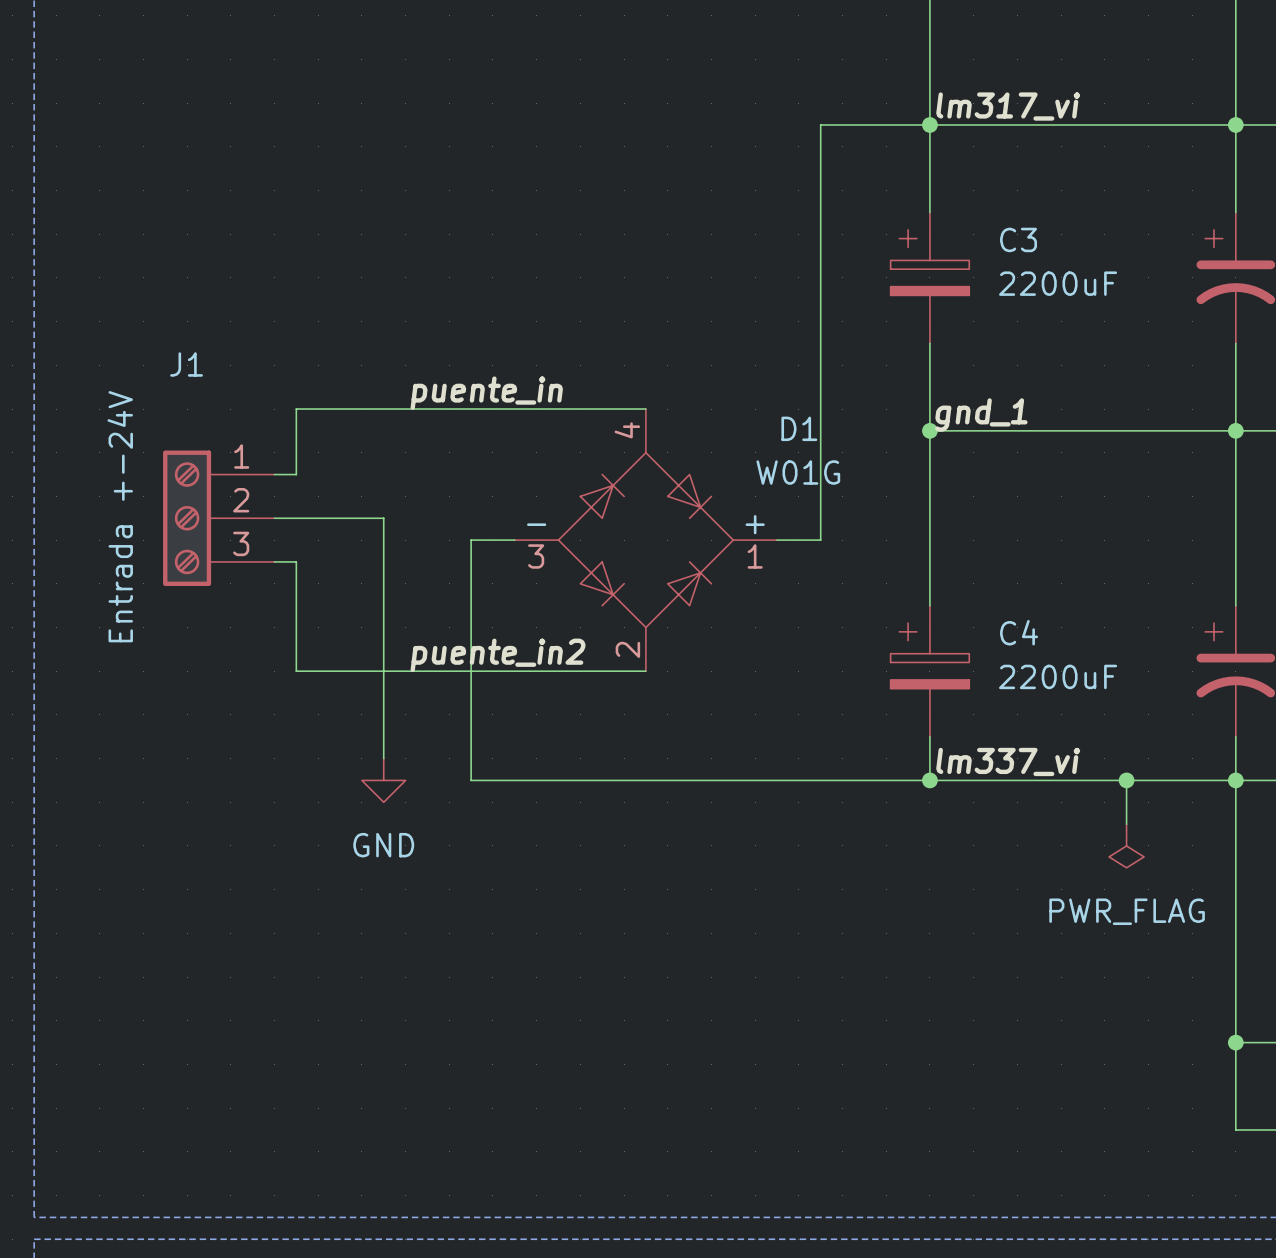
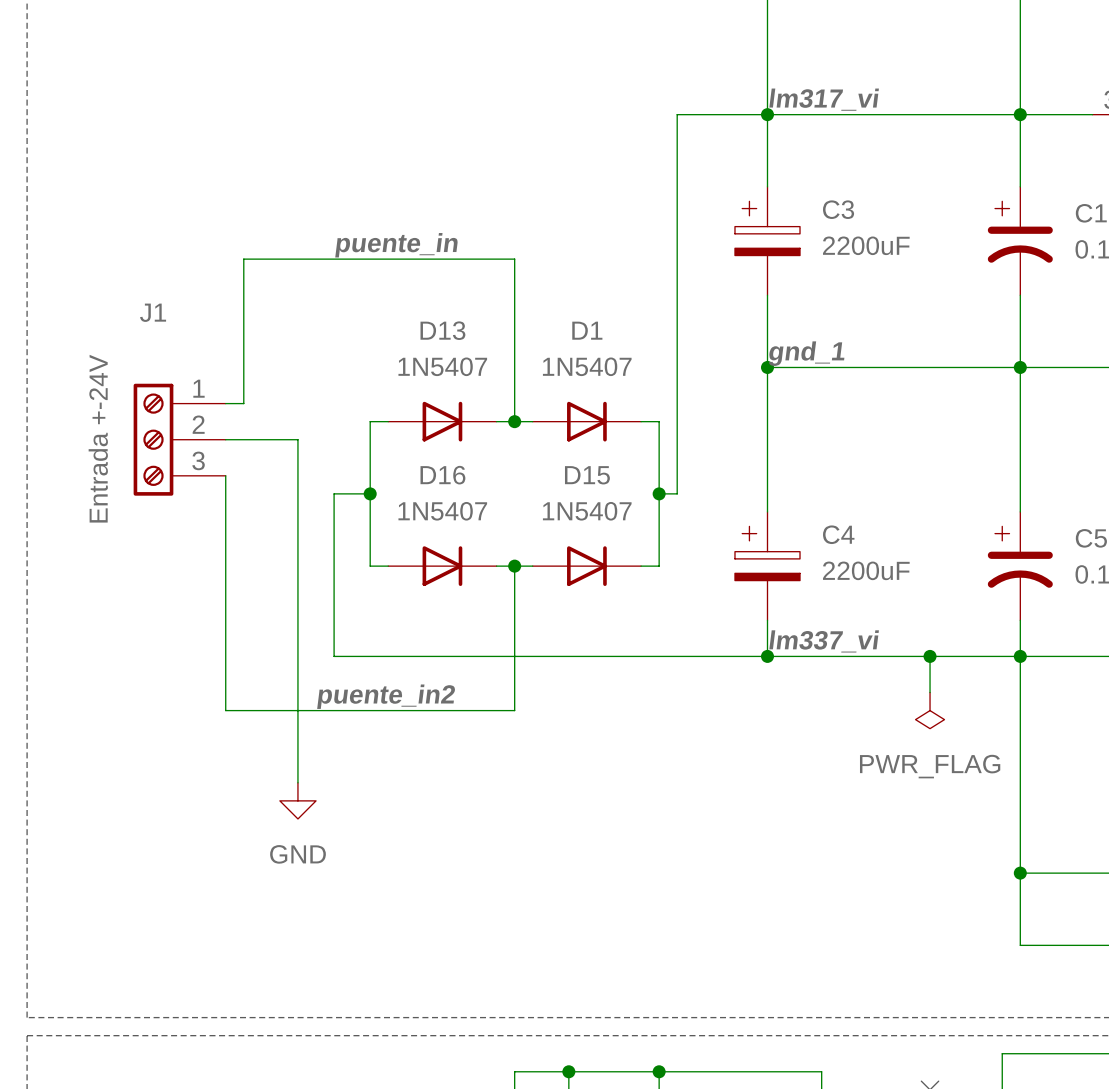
label position: puente_in (486, 393) -> puente_in (396, 245)
wire: (296, 409) (645, 409) -> (243, 349) (243, 259) (514, 259) (514, 421)
D1 symbol: [514, 409, 778, 672] -> [532, 401, 642, 442]
D1 name position: D1 (799, 428) -> D1 (587, 330)
D1 value: W01G (798, 472) -> 1N5407 (587, 366)
wire: none -> (388, 421) (370, 421) (370, 566)
D13: none -> 1N5407 (442, 421)
wire: none -> (496, 421) (532, 421)
junction: none -> (514, 421)
wire: none -> (641, 421) (659, 421) (659, 566) (641, 566)
wire: (361, 518) (383, 518) (383, 758) -> (297, 439) (297, 782)
wire: (514, 540) (471, 540) (471, 780) -> (370, 493) (334, 493) (334, 656) (388, 656)
wire: (777, 540) (820, 540) -> (659, 493) (677, 493) (677, 457)
wire: (274, 561) (296, 561) (296, 671) (449, 671) -> (225, 475) (225, 710) (514, 710) (514, 566)
junction: none -> (370, 493)
junction: none -> (659, 493)
label position: puente_in2 (498, 655) -> puente_in2 (386, 696)
D16: none -> 1N5407 (442, 566)
junction: none -> (514, 566)
D15: none -> 1N5407 (586, 566)
power symbol position: GND (383, 780) -> GND (297, 800)

